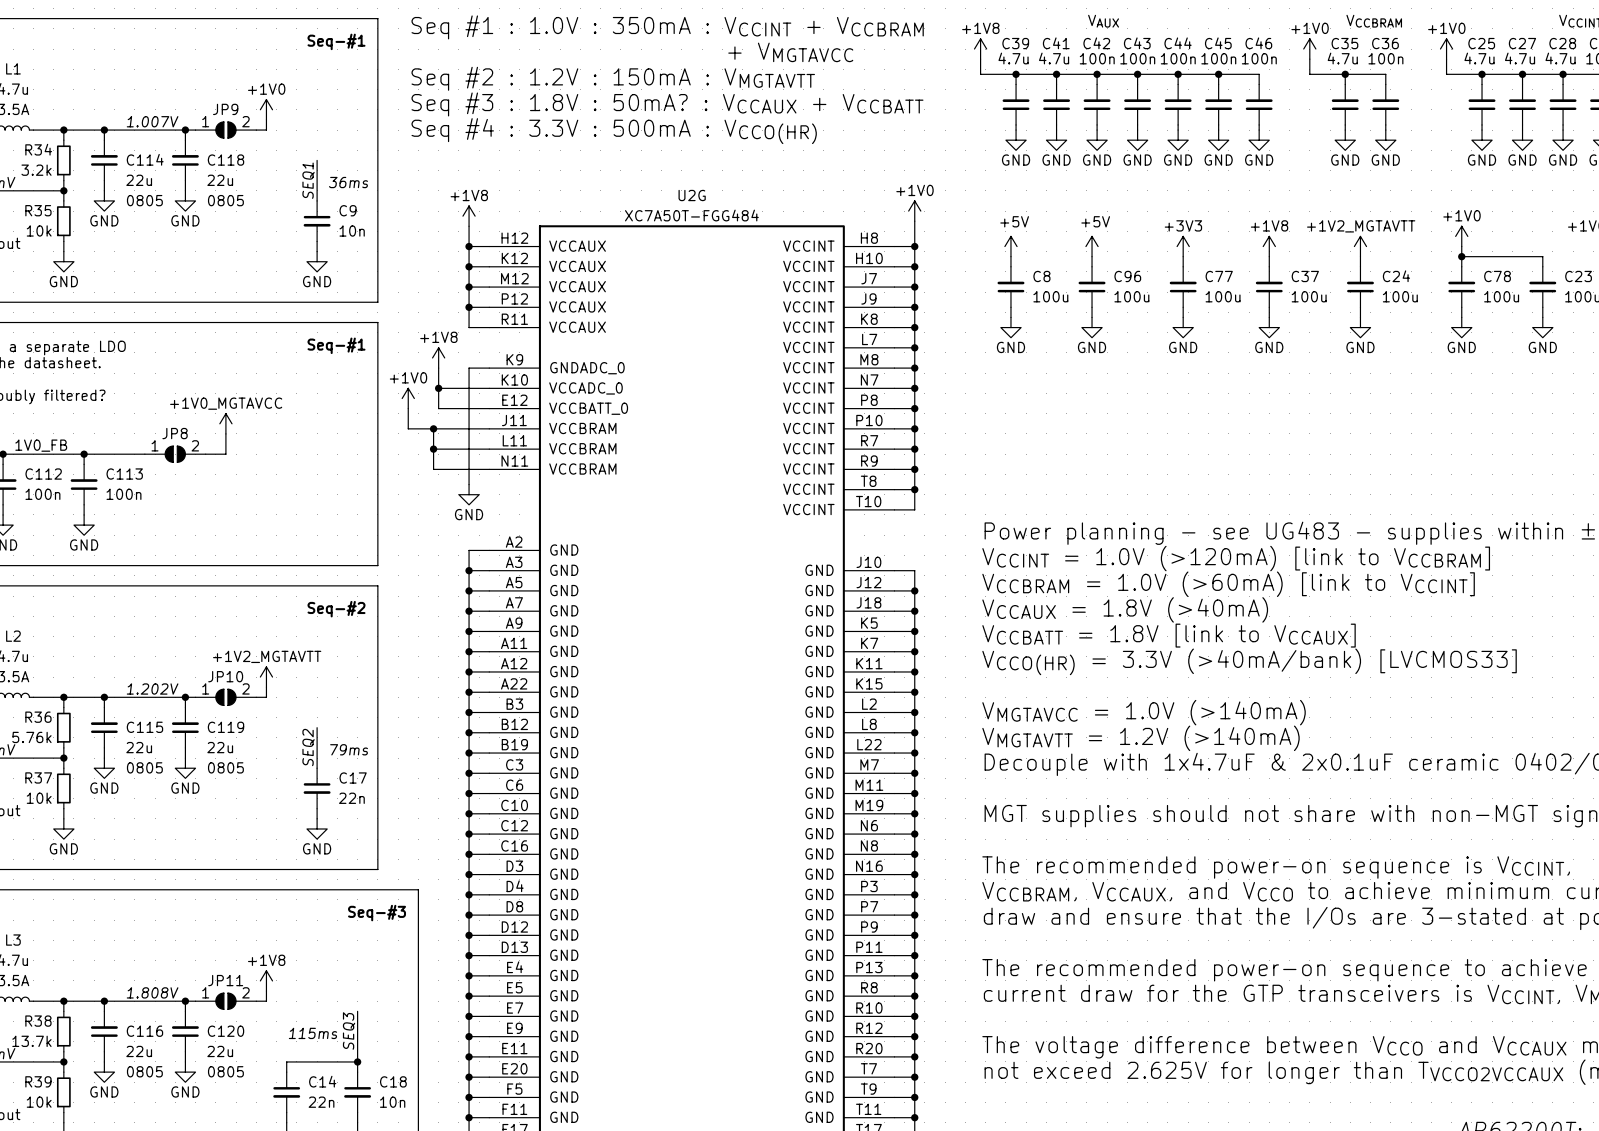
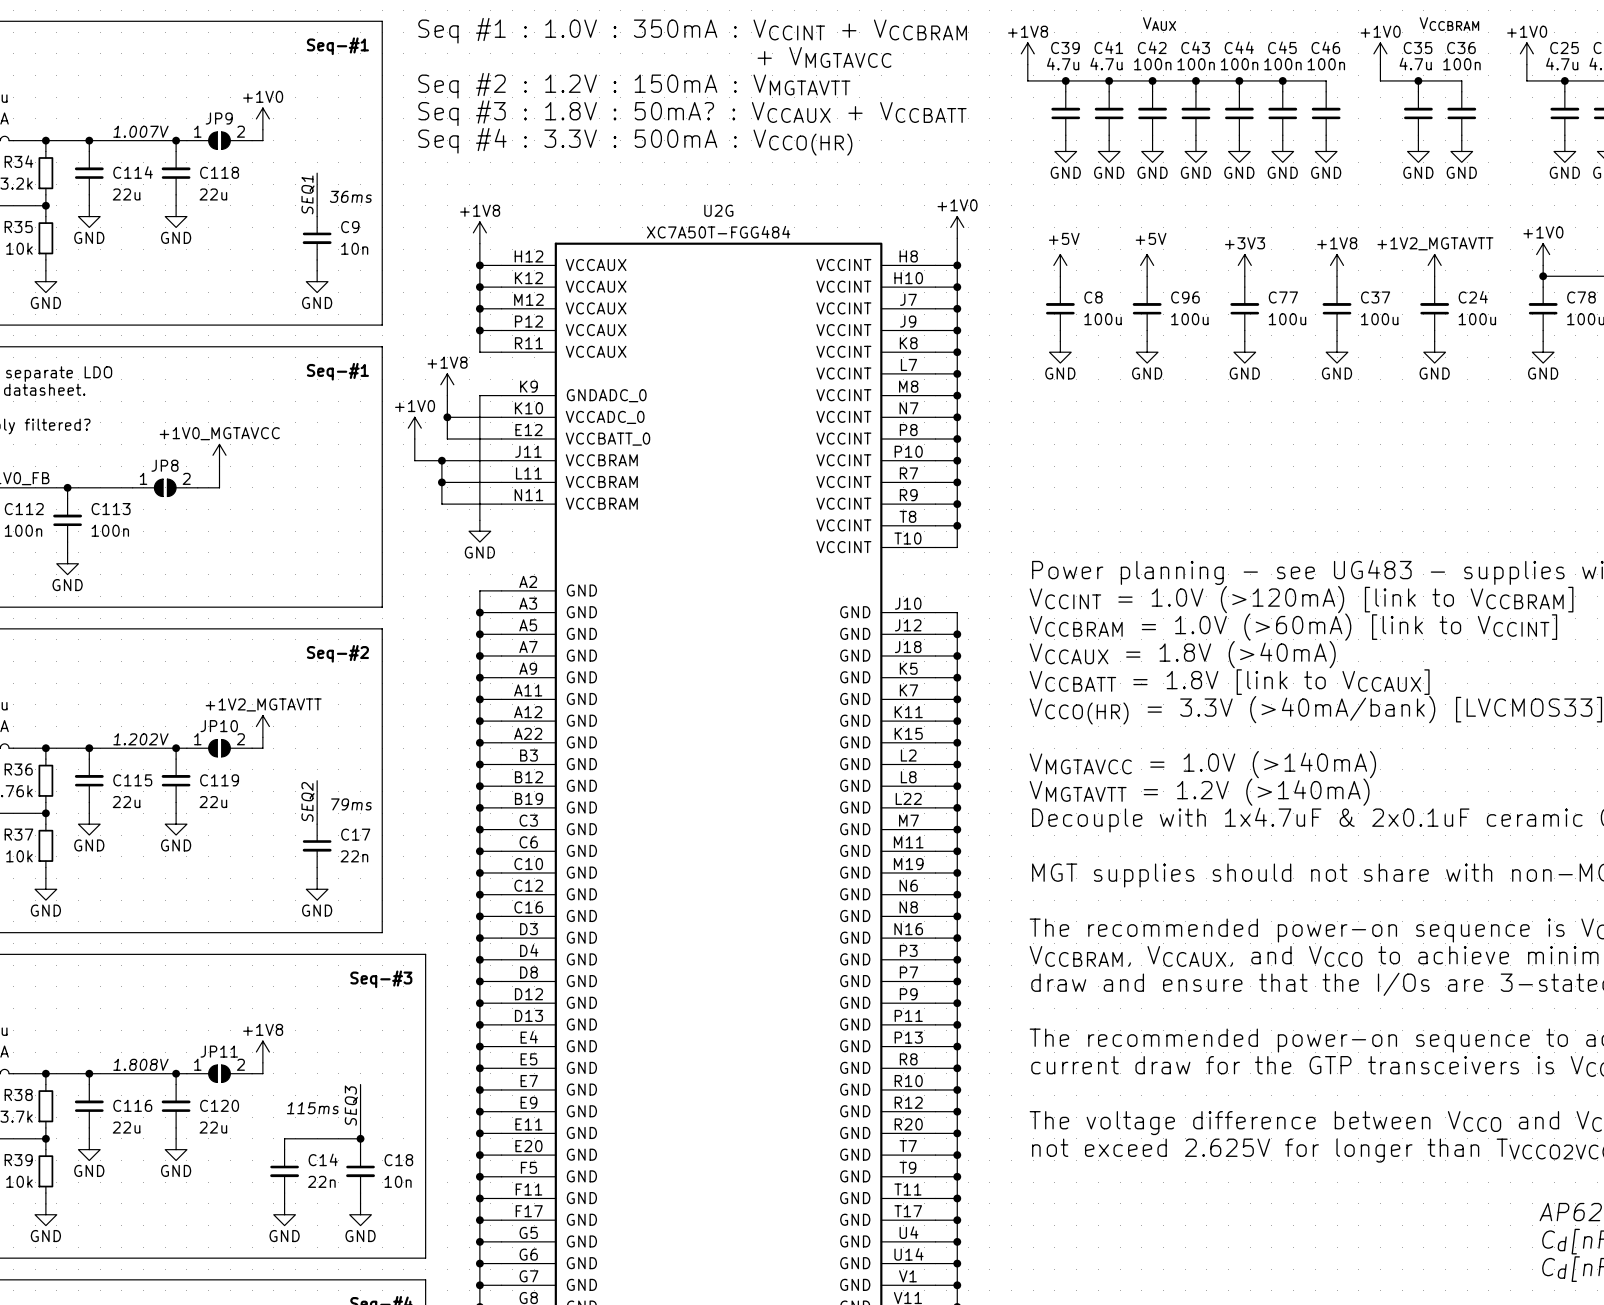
C114 text: 0805 (144, 200) -> none
C118 text: 0805 (225, 200) -> none
C115 text: 0805 (144, 767) -> none
C119 text: 0805 (225, 767) -> none
C116 text: 0805 (144, 1071) -> none
C120 text: 0805 (225, 1071) -> none

